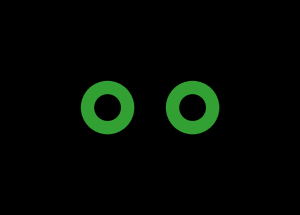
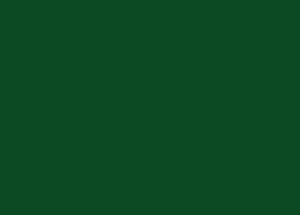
part: (150, 107) -> none

